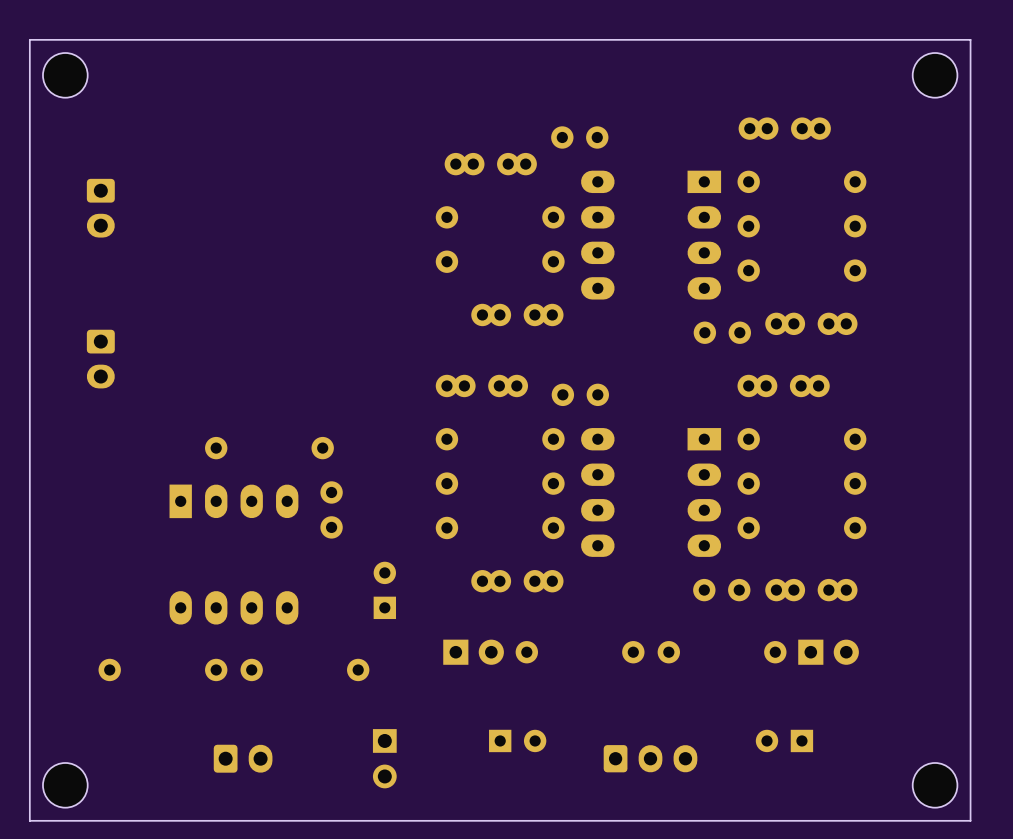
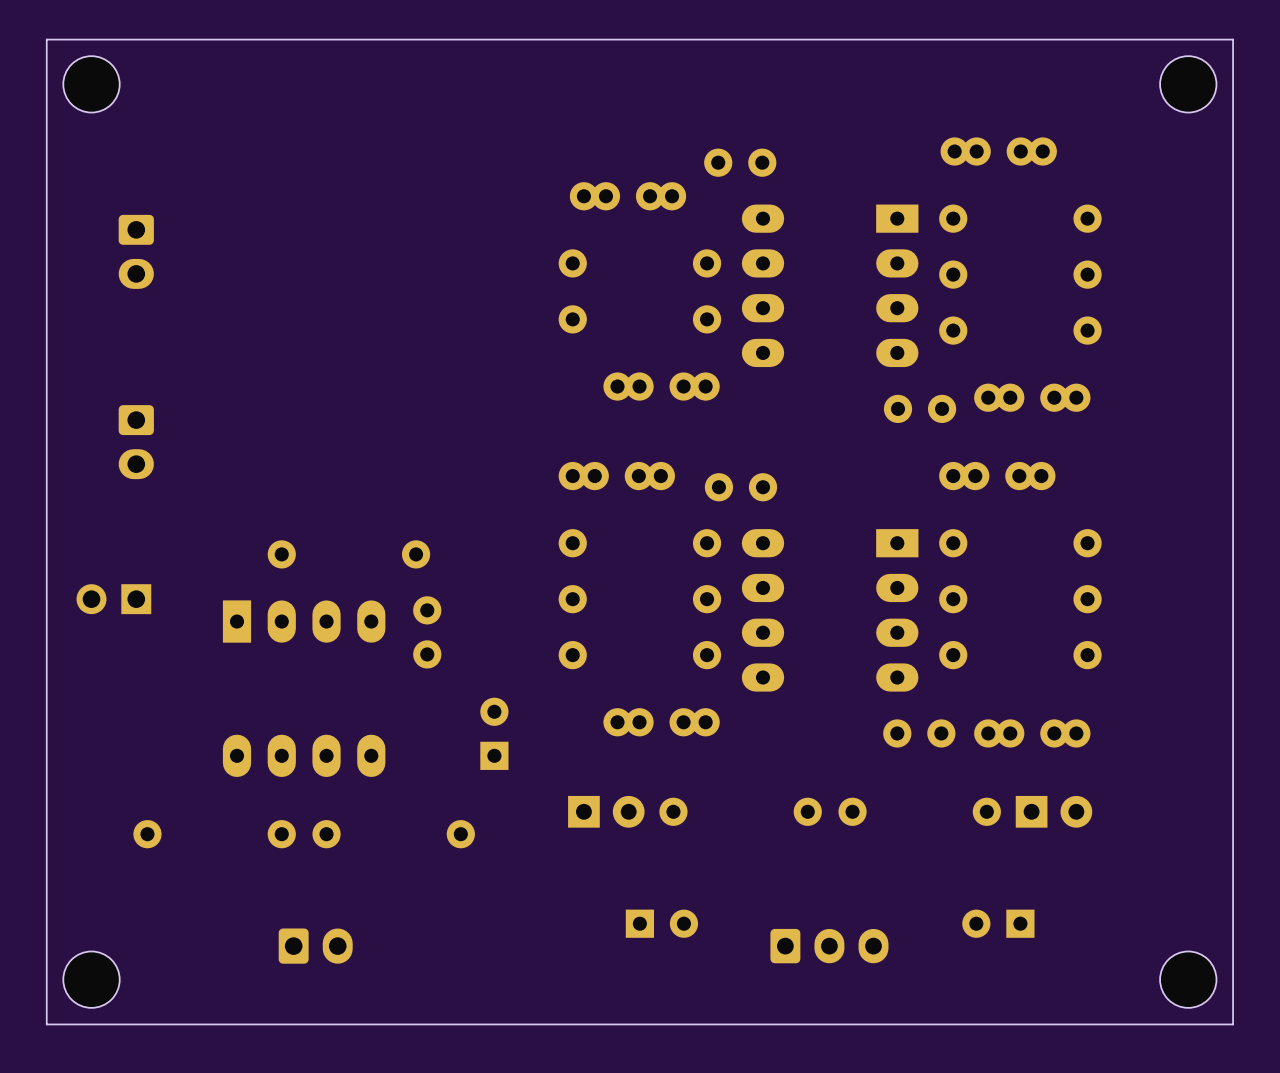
part: none -> (113, 599)
part: (384, 758) -> none

